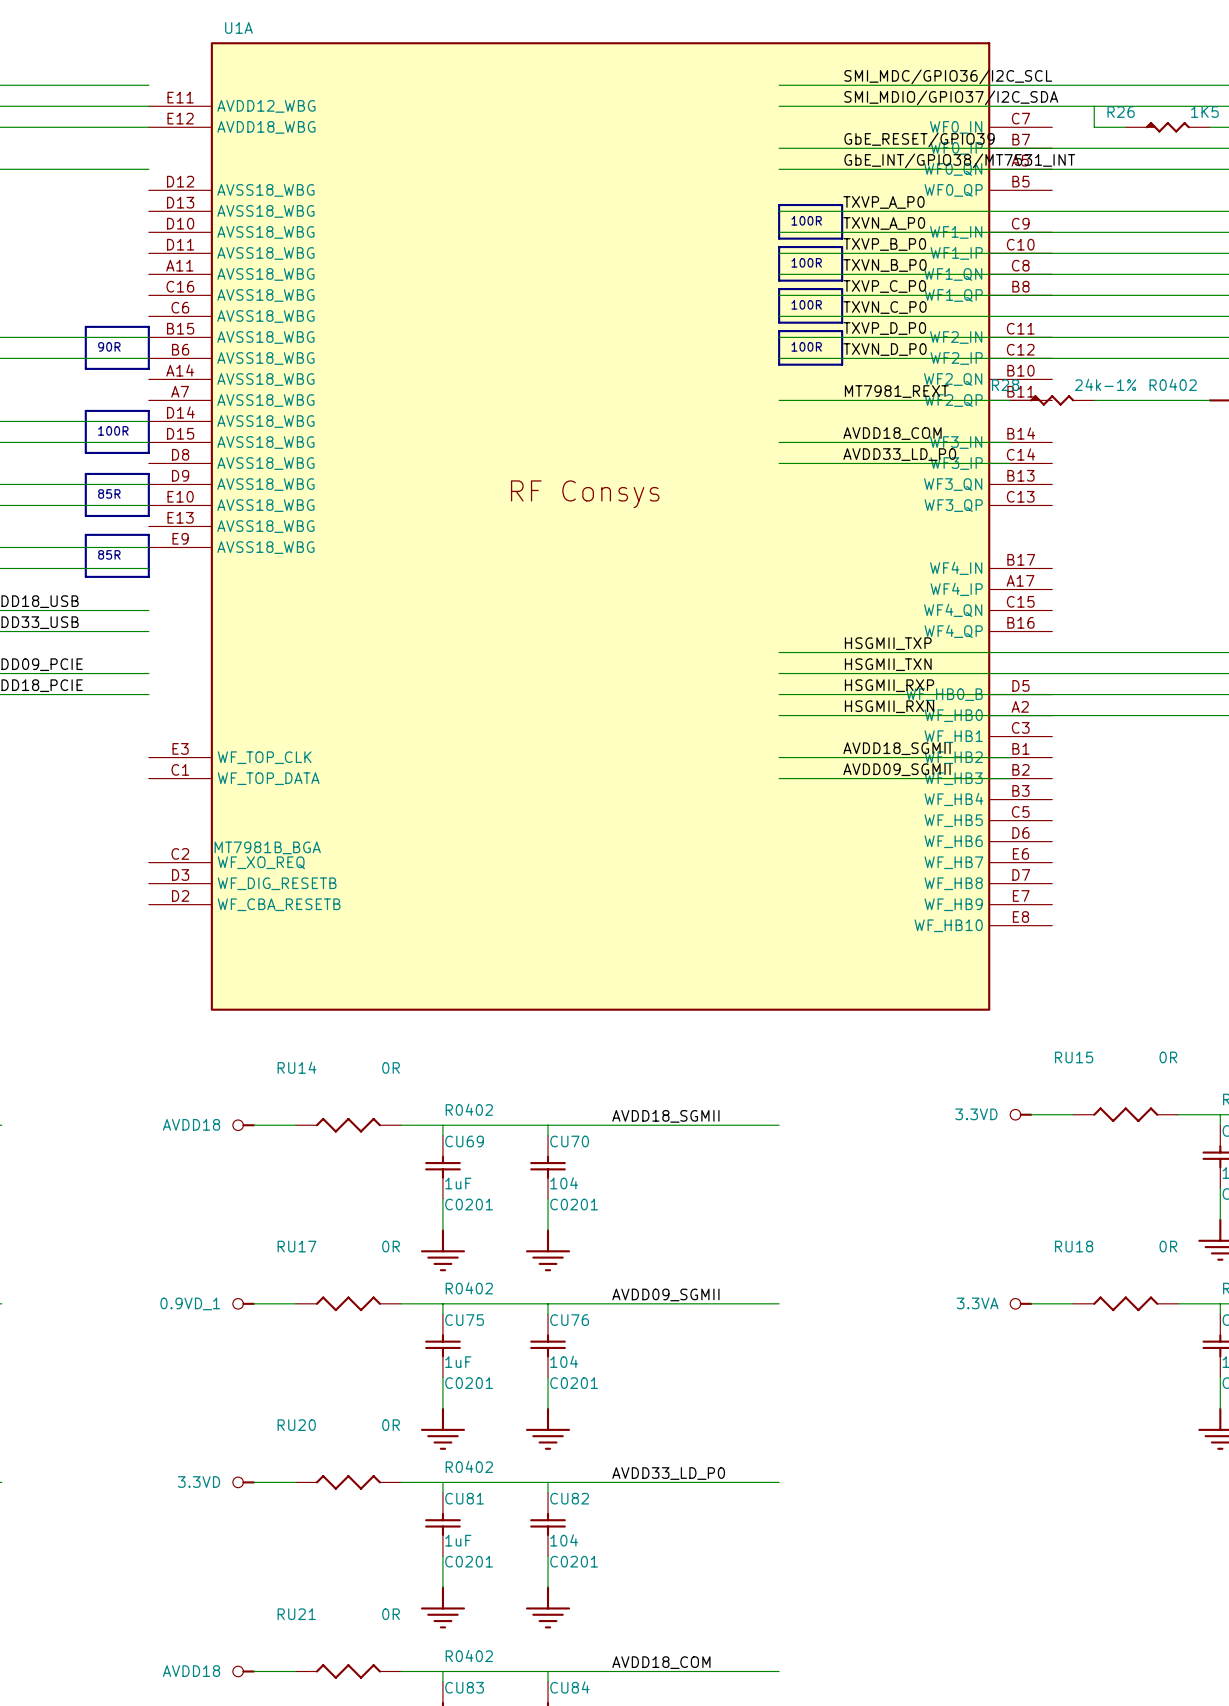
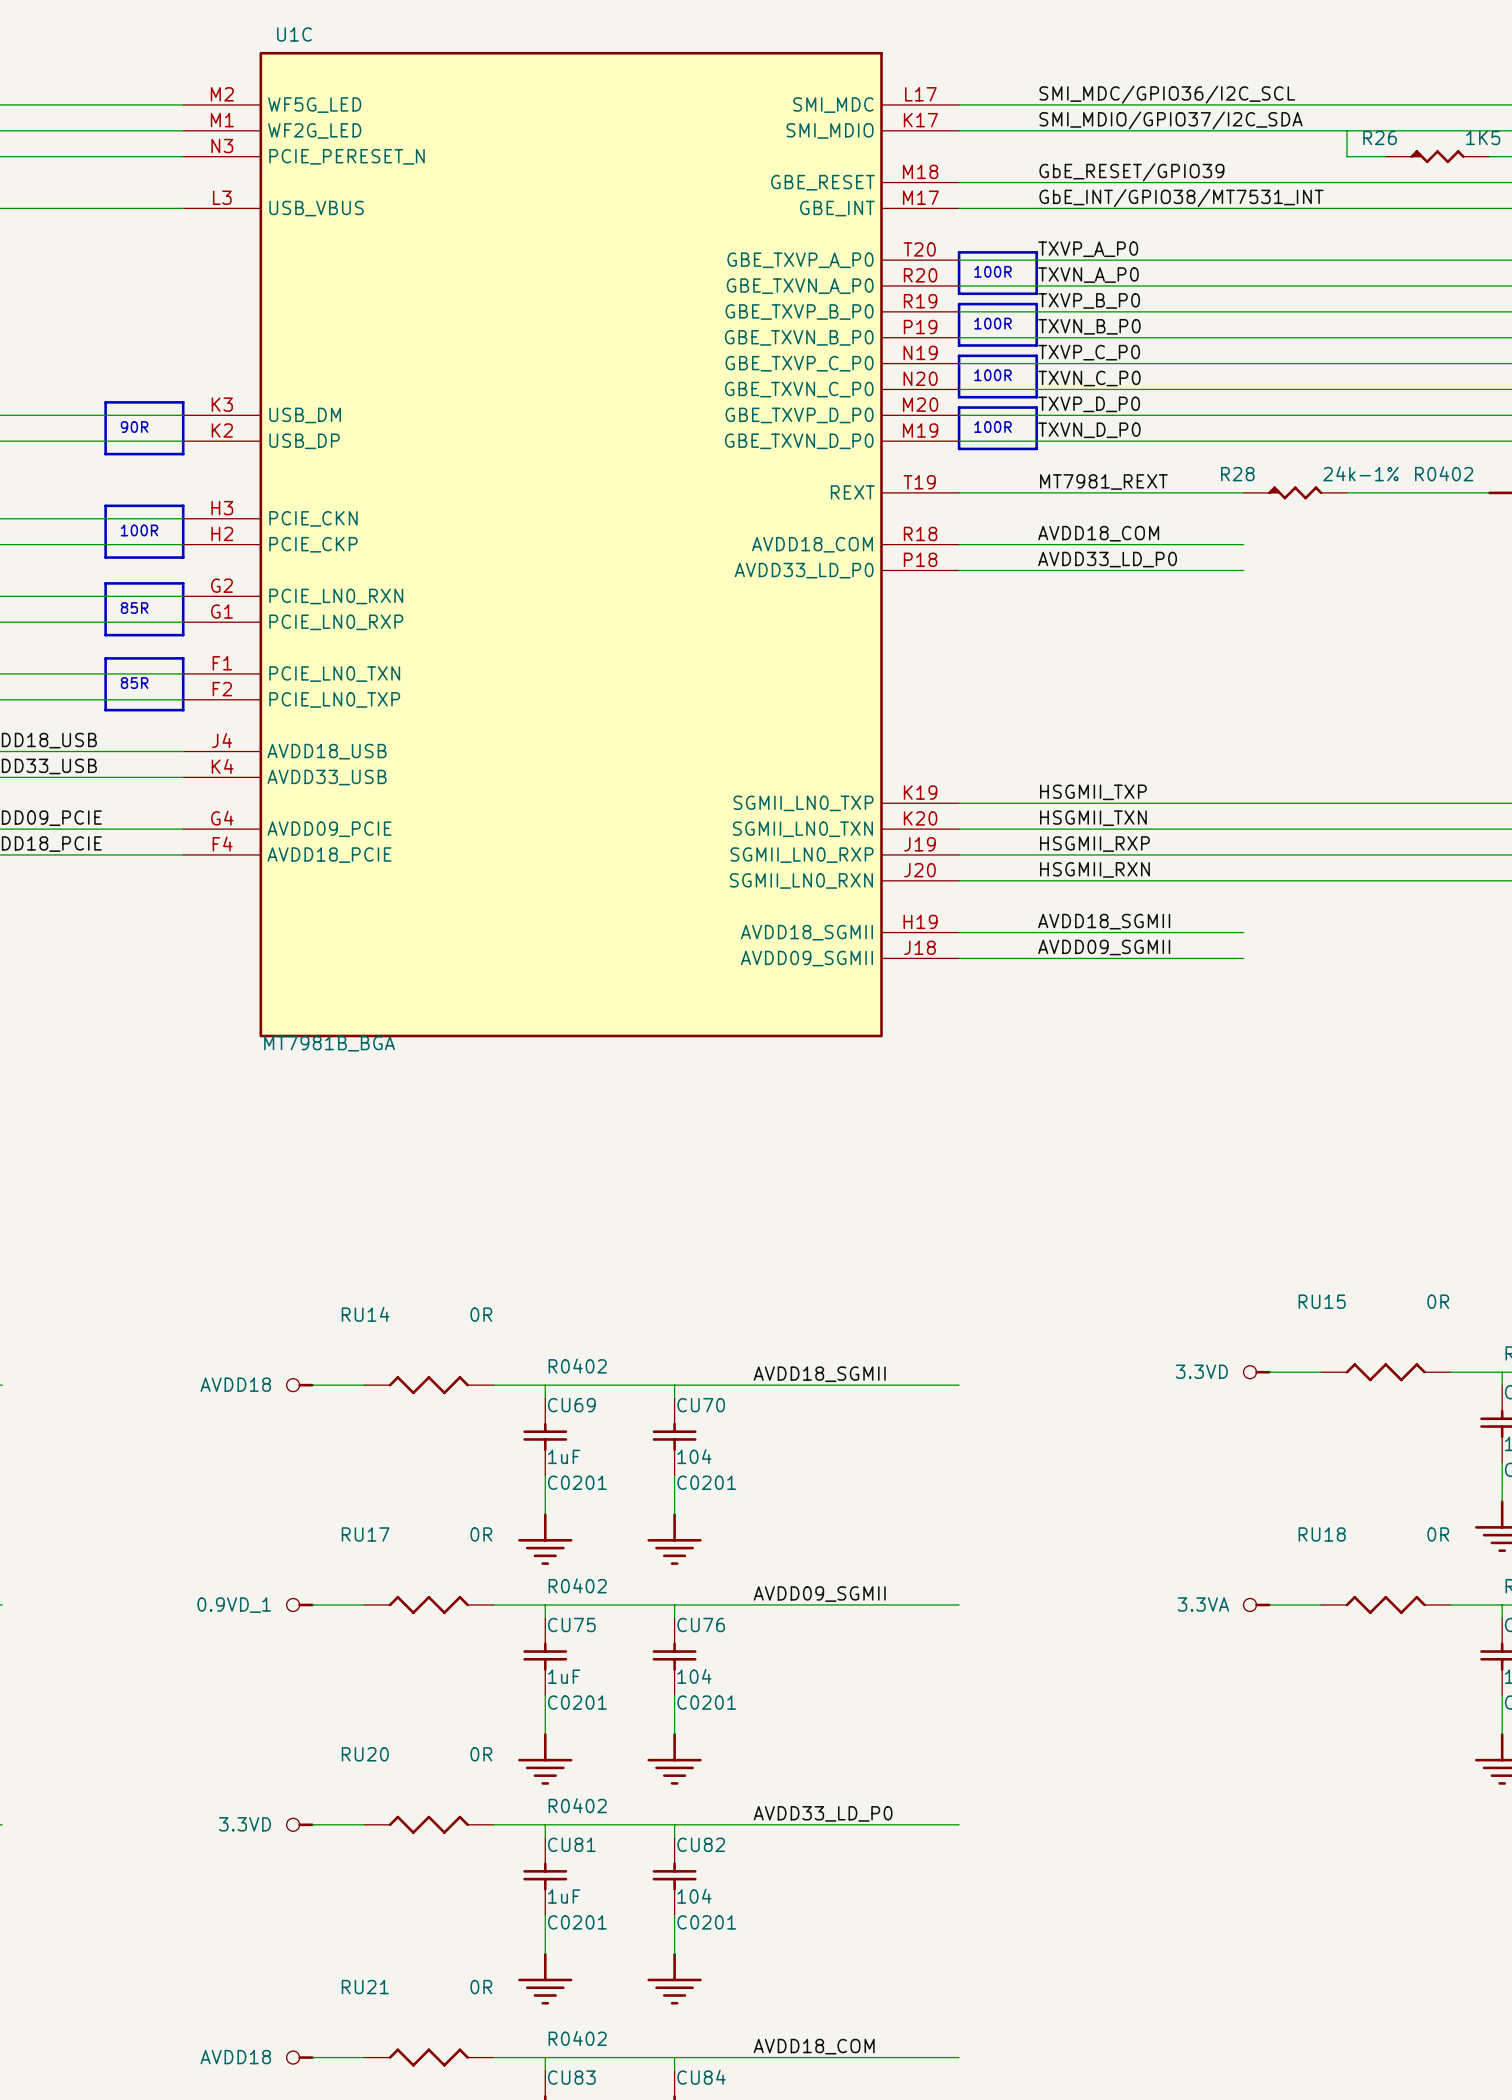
U1C: none -> MT7981B_BGA (571, 544)
U1A: MT7981B_BGA (600, 526) -> none

